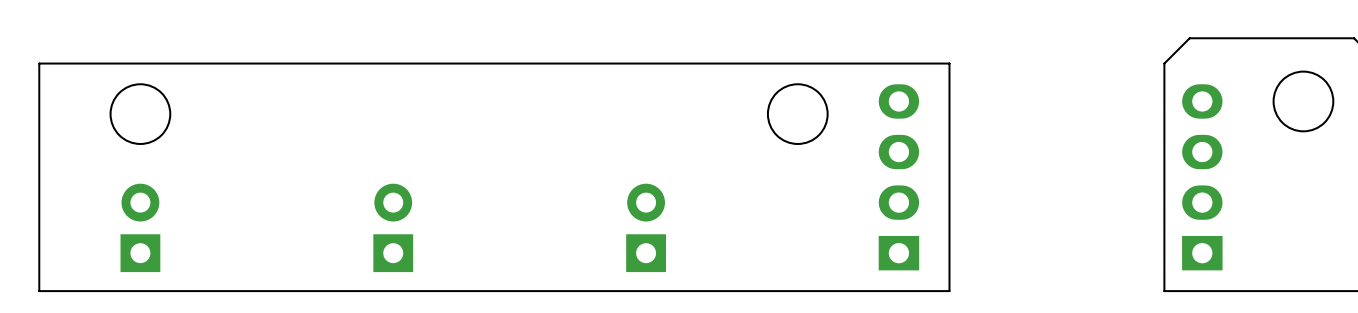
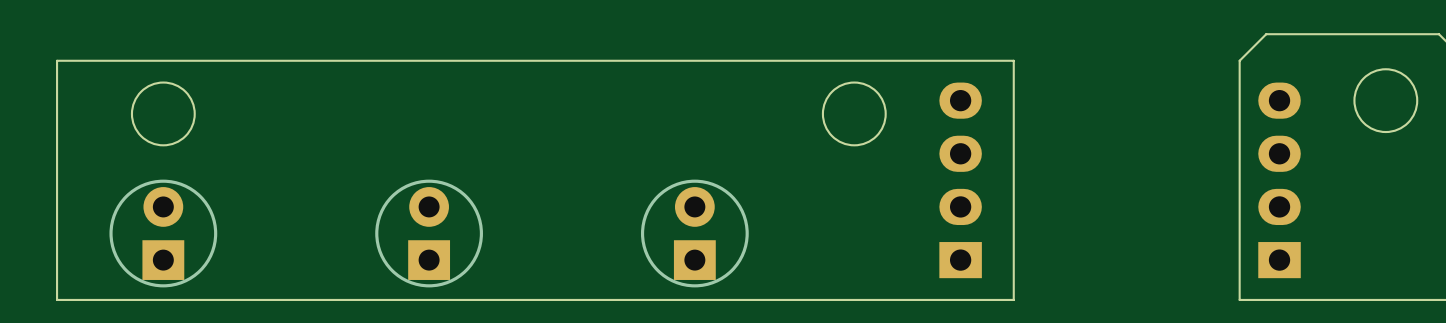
part footprint: [120, 183, 161, 273] -> [109, 179, 218, 288]
part footprint: [373, 183, 414, 273] -> [375, 179, 483, 288]
part footprint: [626, 183, 666, 273] -> [640, 179, 749, 288]

